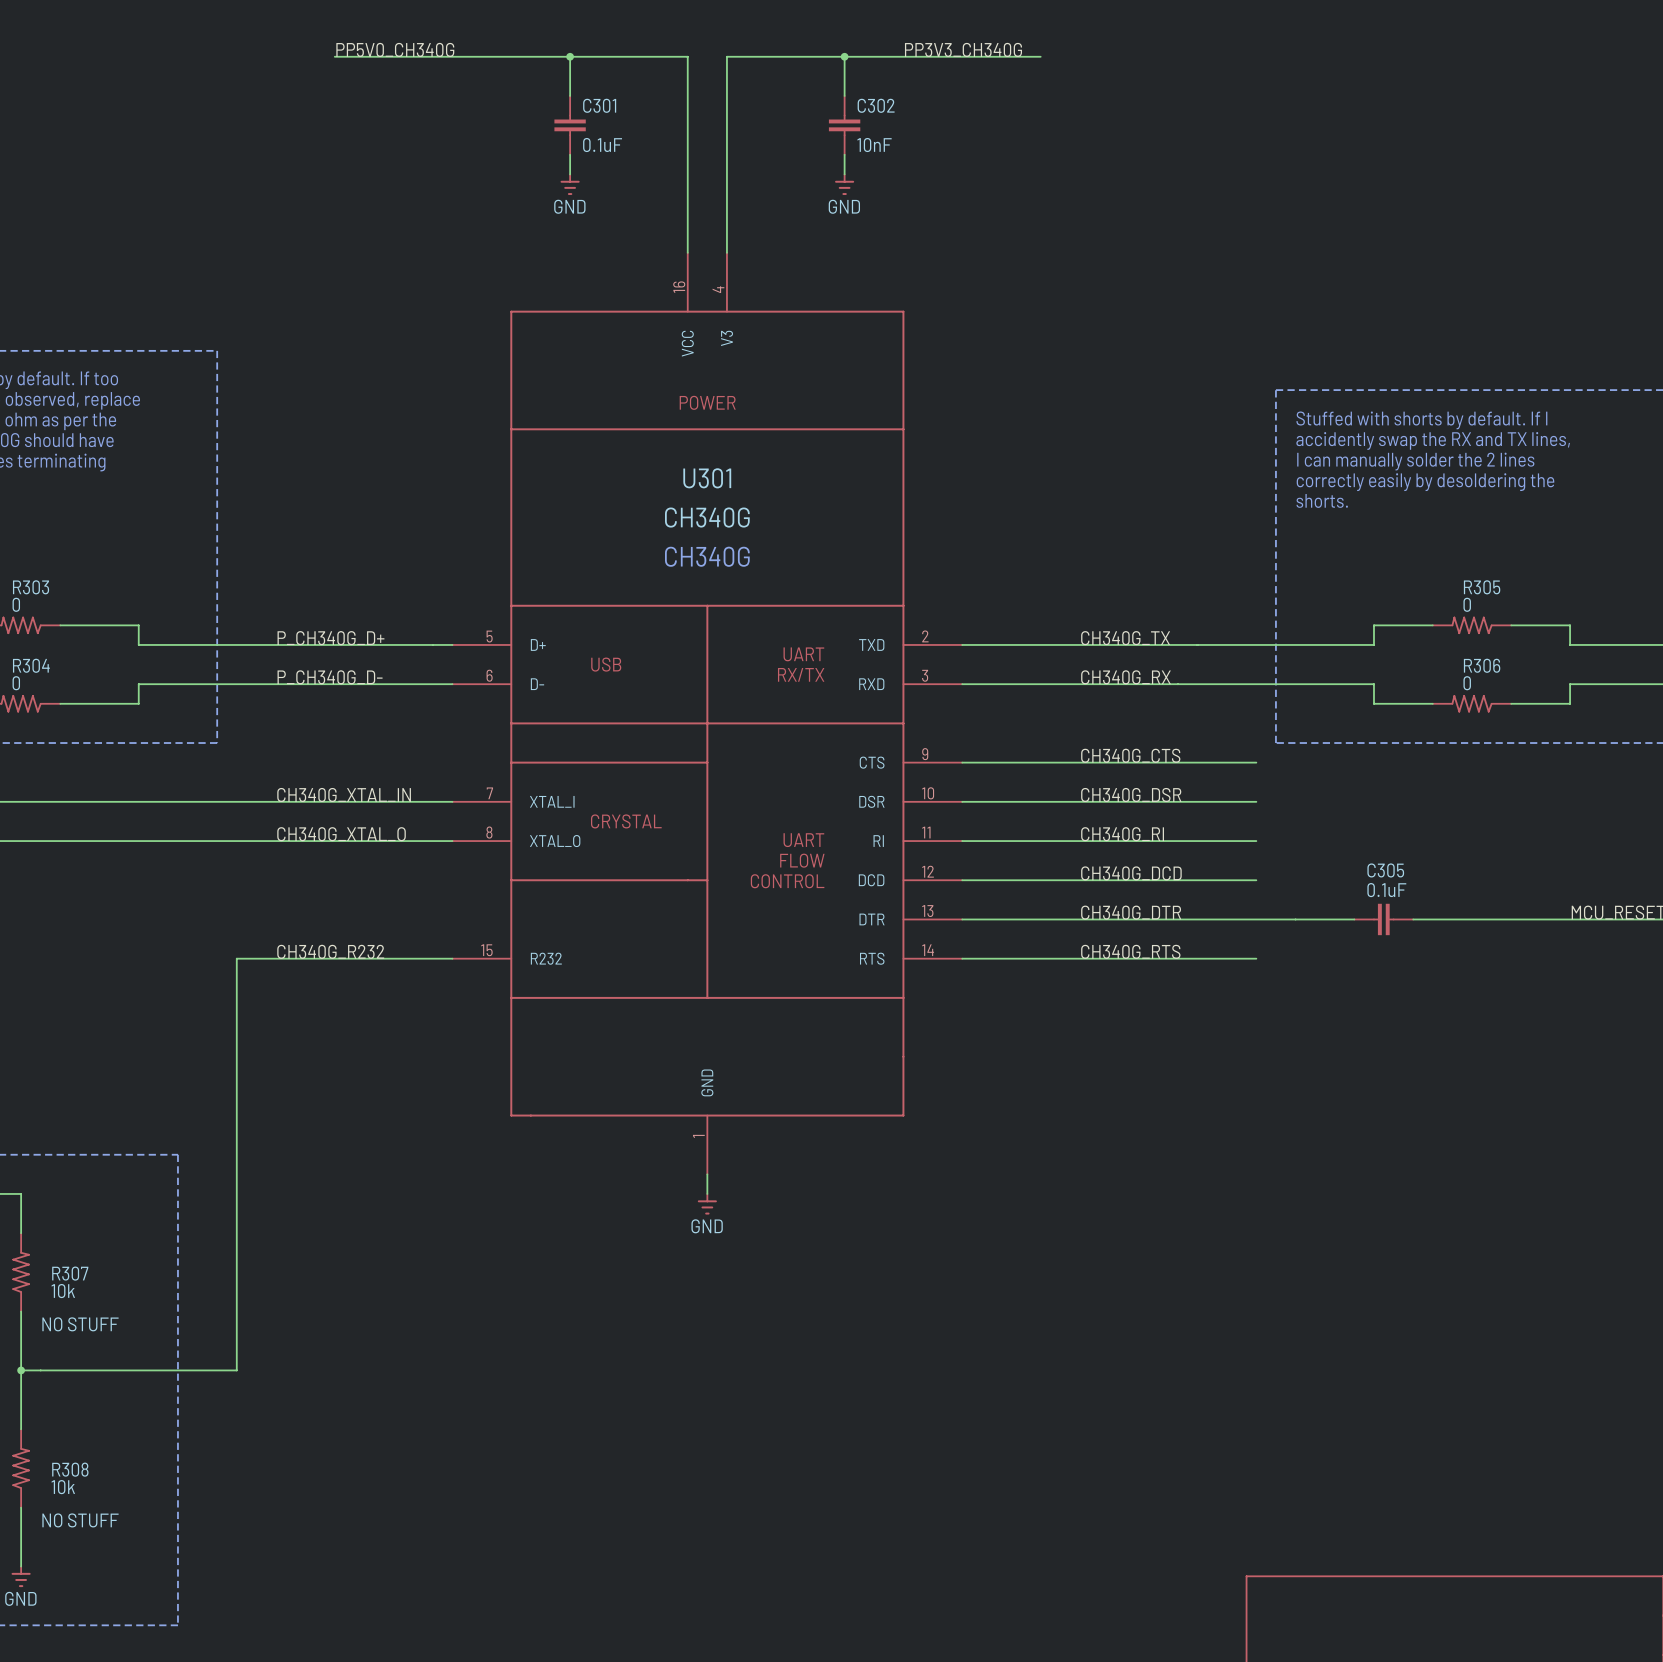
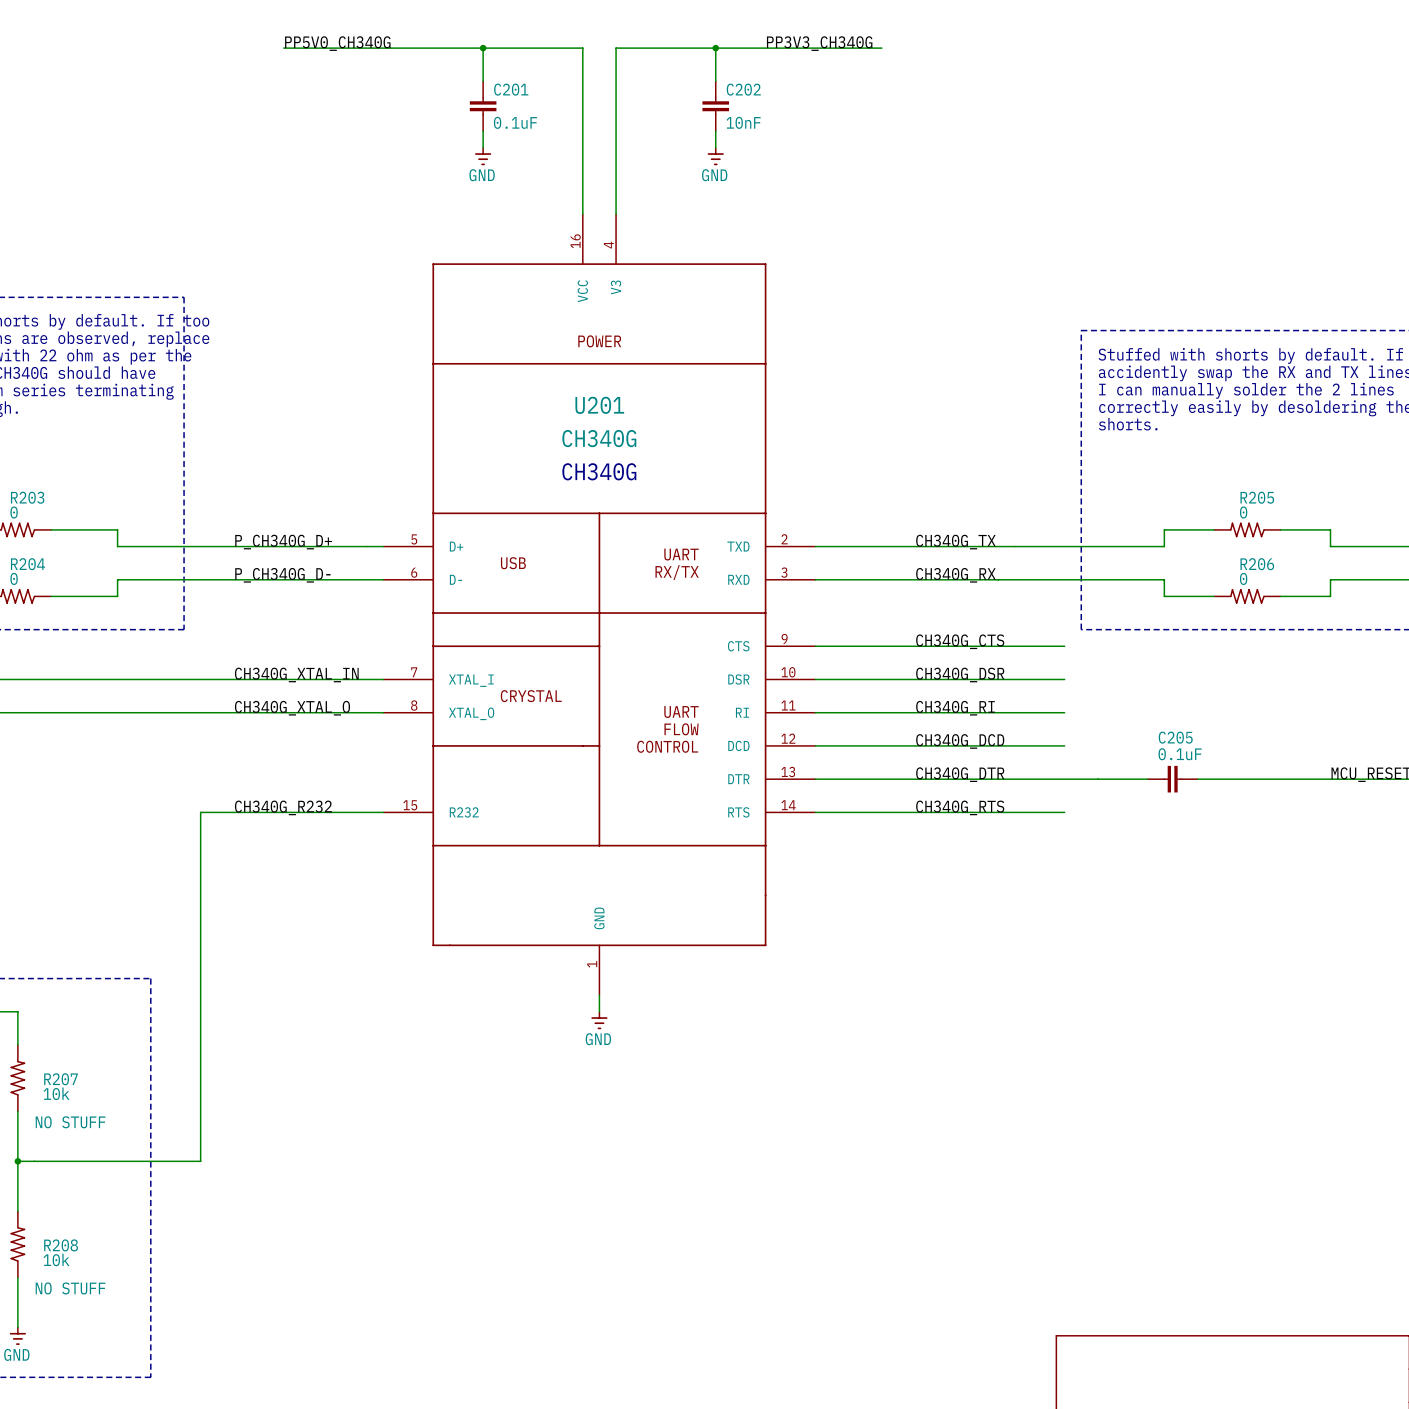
C301 name: C301 (599, 105) -> C201 (511, 89)
C302 name: C302 (876, 105) -> C202 (743, 89)
U301 name: U301 (707, 478) -> U201 (599, 405)
R303 name: R303 (31, 587) -> R203 (27, 497)
R305 name: R305 (1482, 587) -> R205 (1257, 497)
R304 name: R304 (31, 665) -> R204 (27, 564)
R306 name: R306 (1482, 665) -> R206 (1257, 564)
C305 name: C305 (1385, 870) -> C205 (1175, 737)
R307 name: R307 (70, 1273) -> R207 (60, 1079)
R308 name: R308 (70, 1469) -> R208 (61, 1245)

